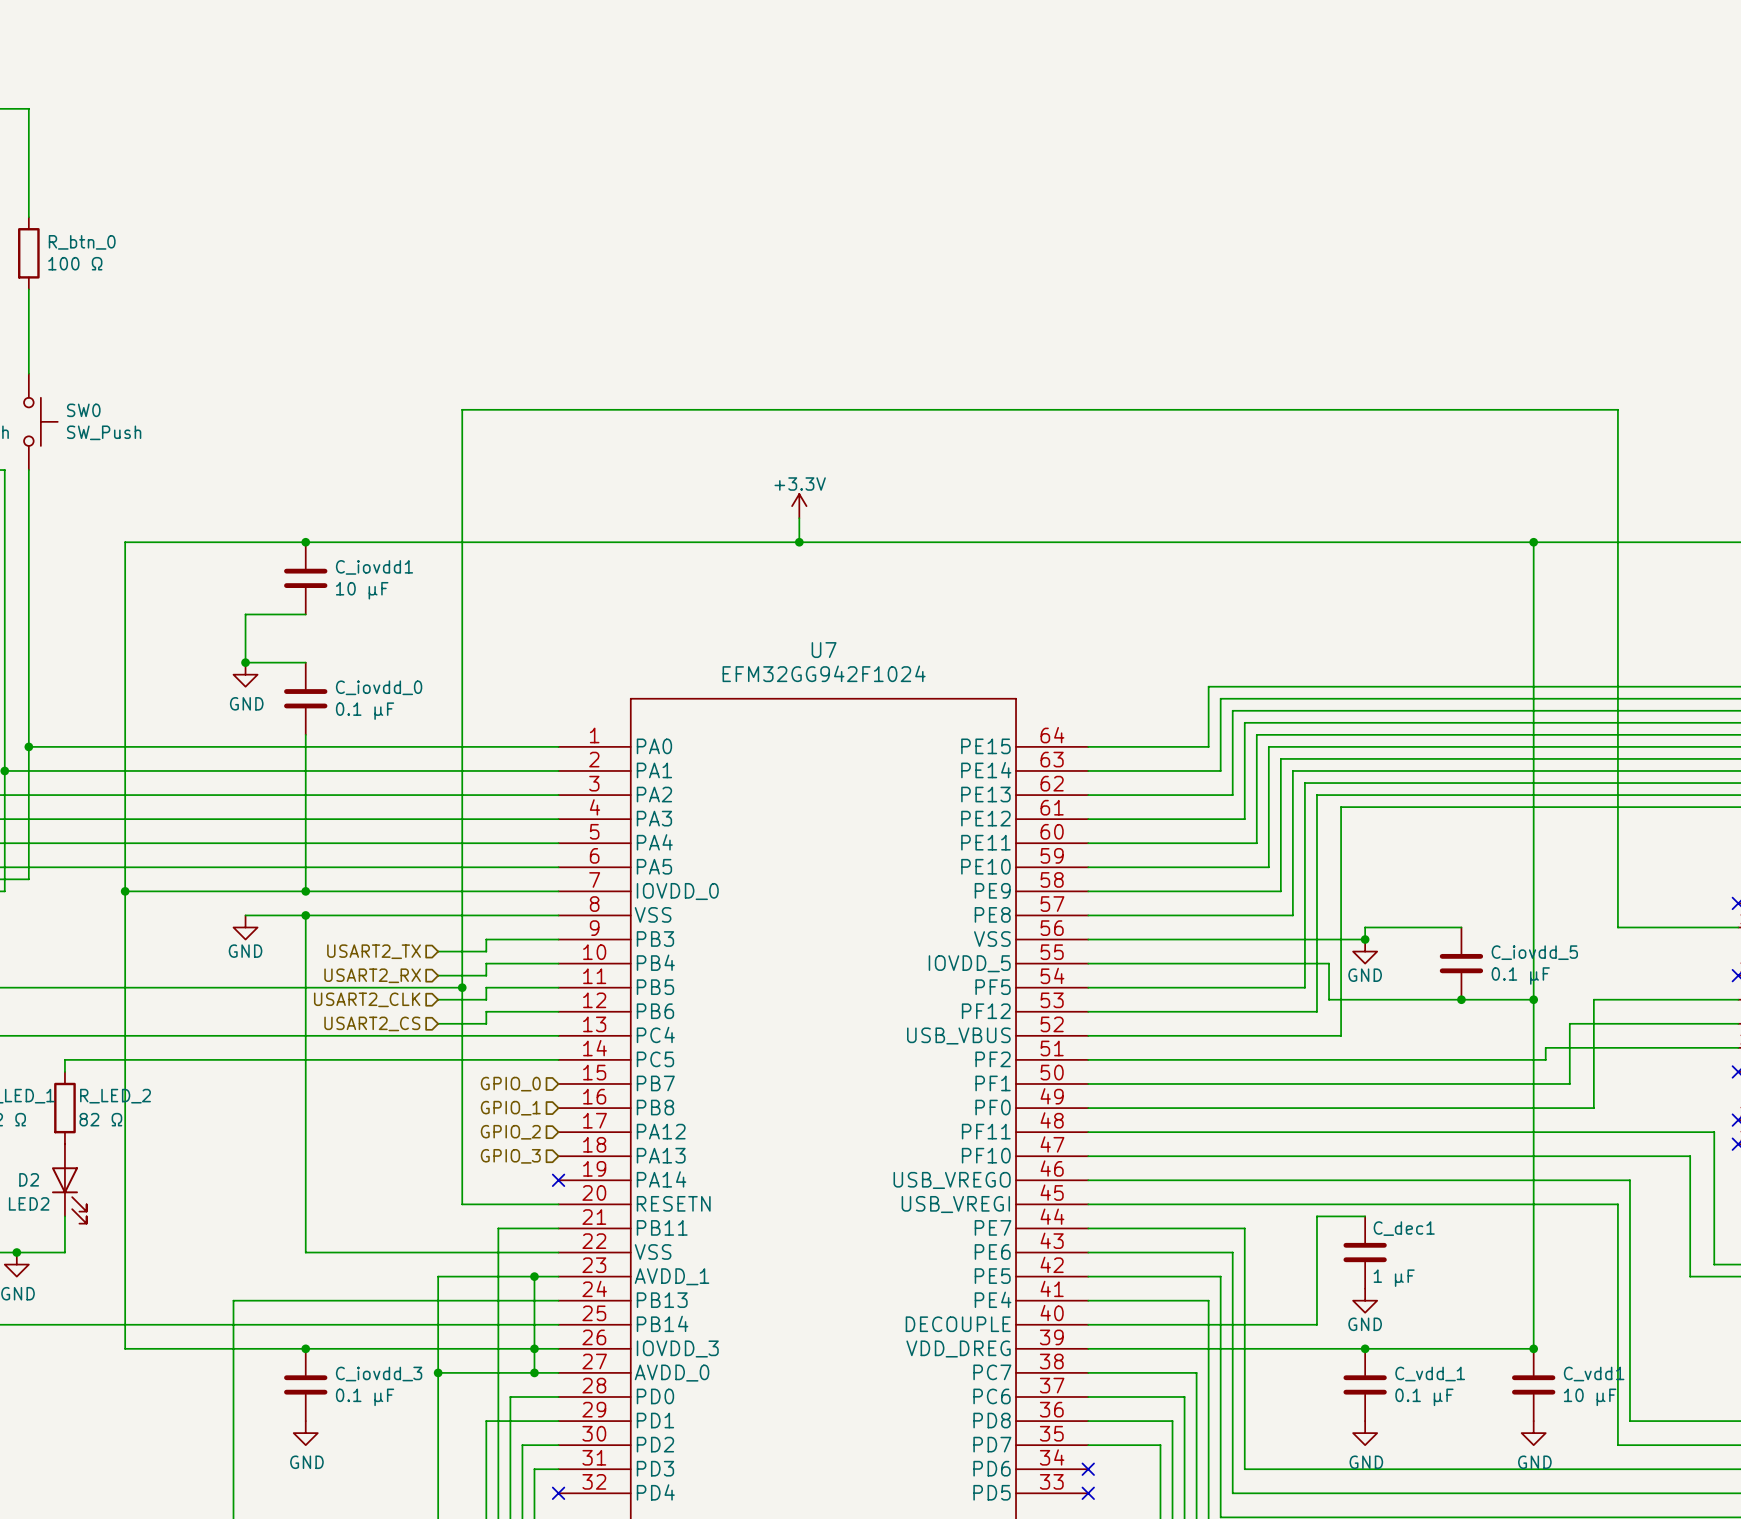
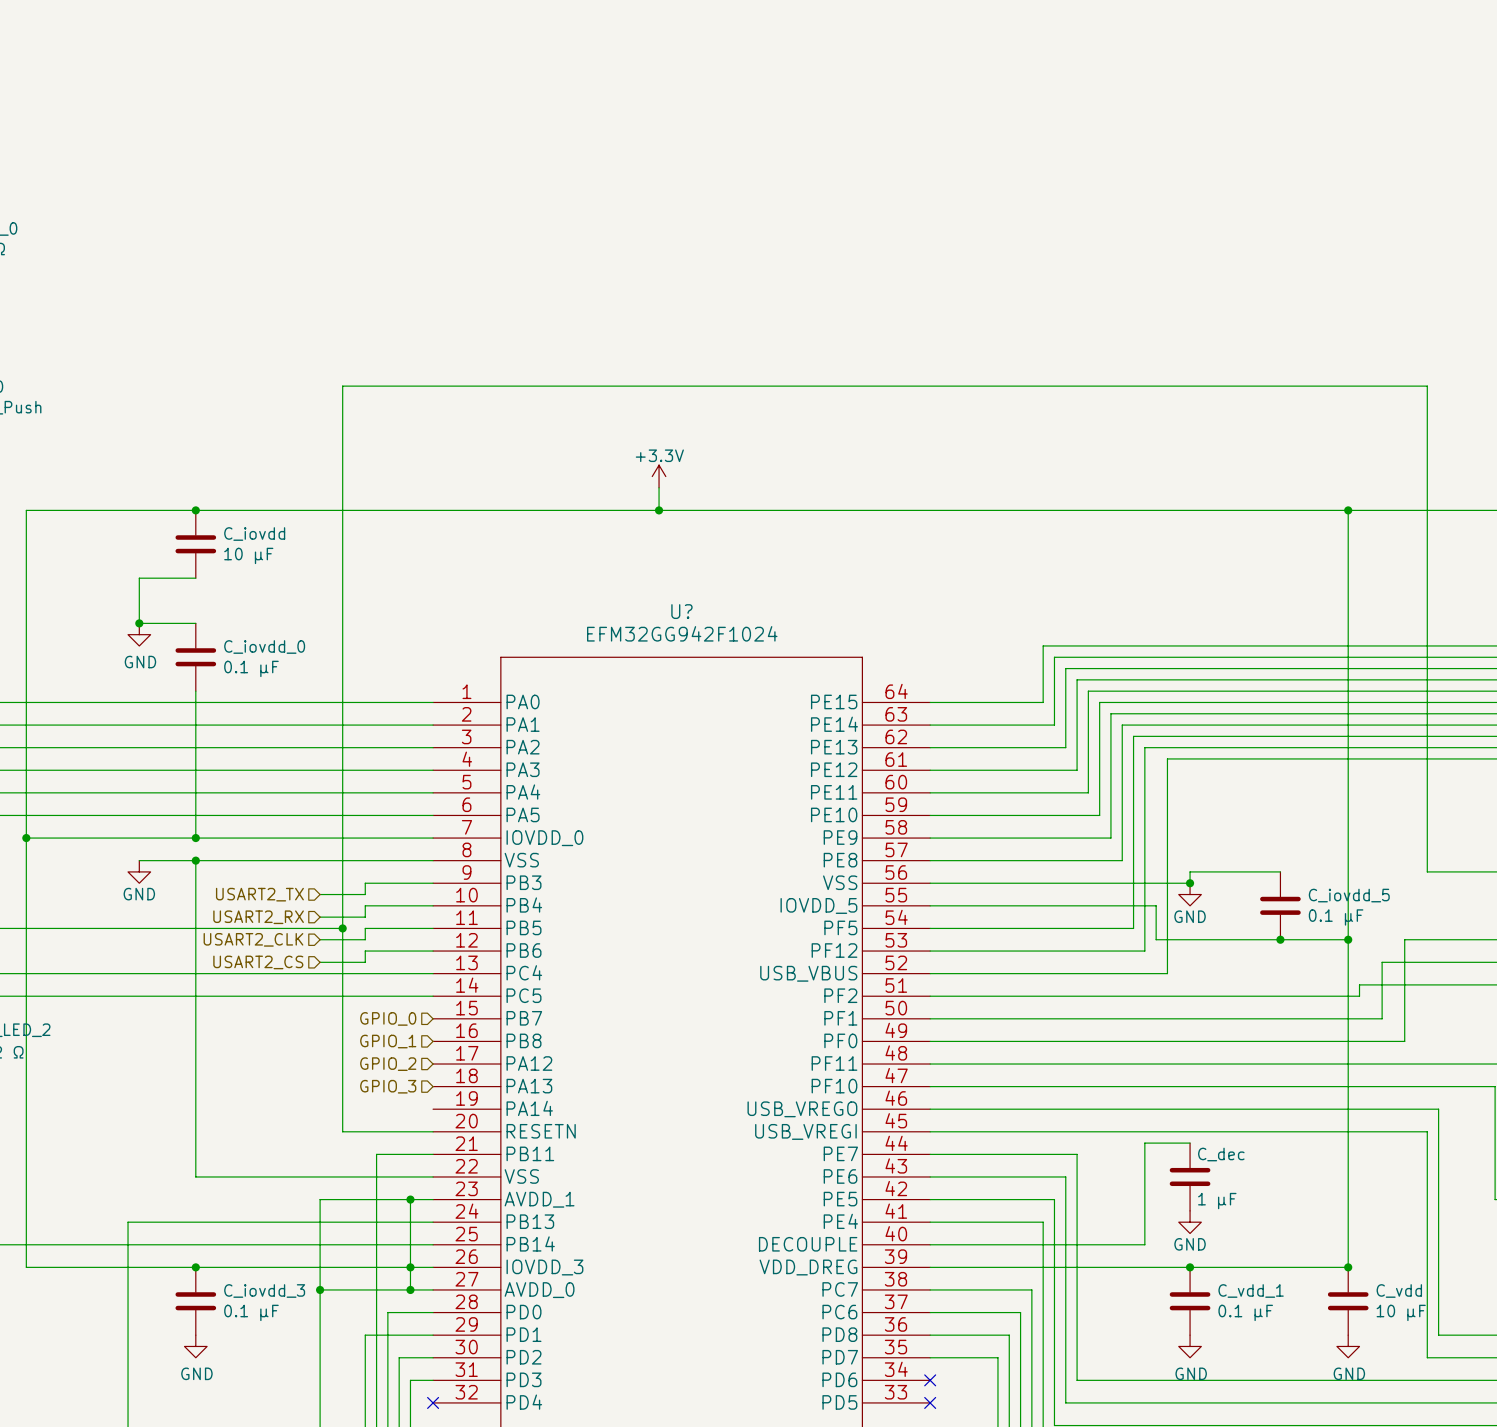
C_iovdd1 name: C_iovdd1 (374, 567) -> C_iovdd (254, 534)
U7 name: U7 (824, 650) -> U? (681, 611)
no-connect mark: (558, 1180) -> none
C_dec1 name: C_dec1 (1404, 1228) -> C_dec (1221, 1154)
C_vdd1 name: C_vdd1 (1594, 1374) -> C_vdd (1399, 1290)

